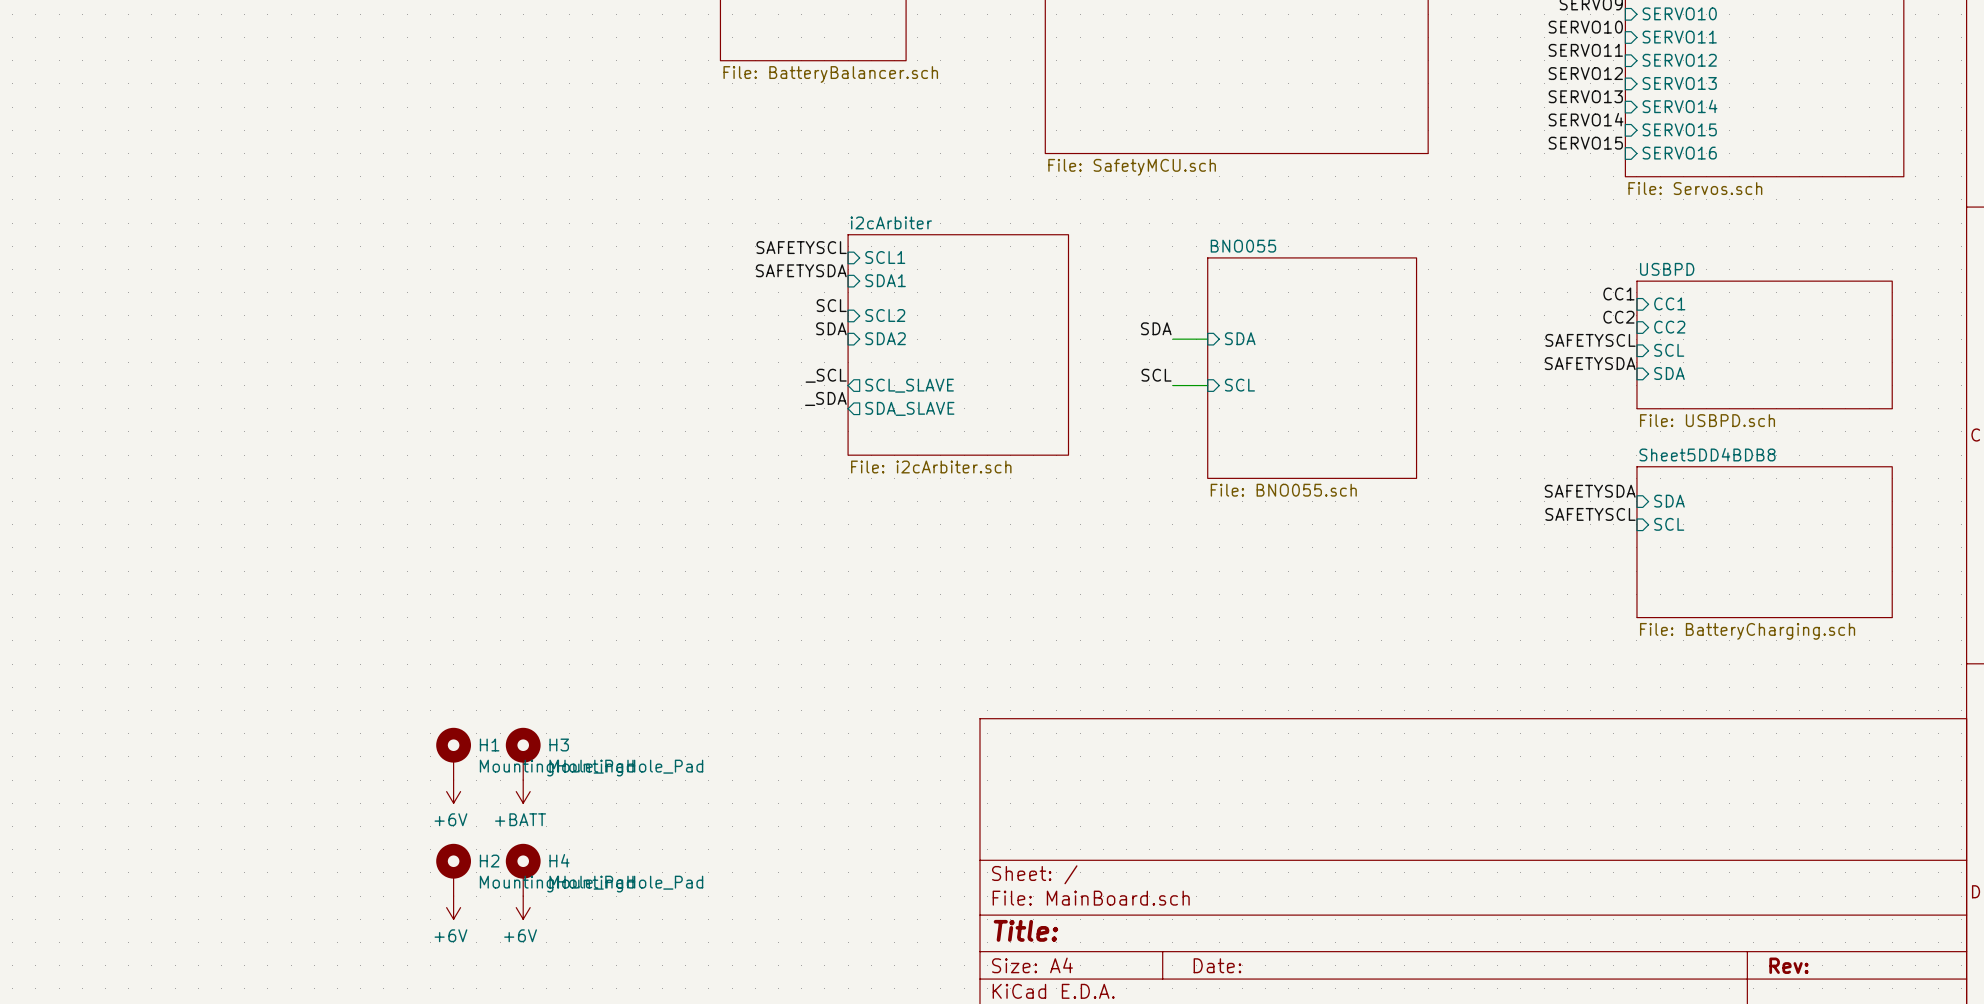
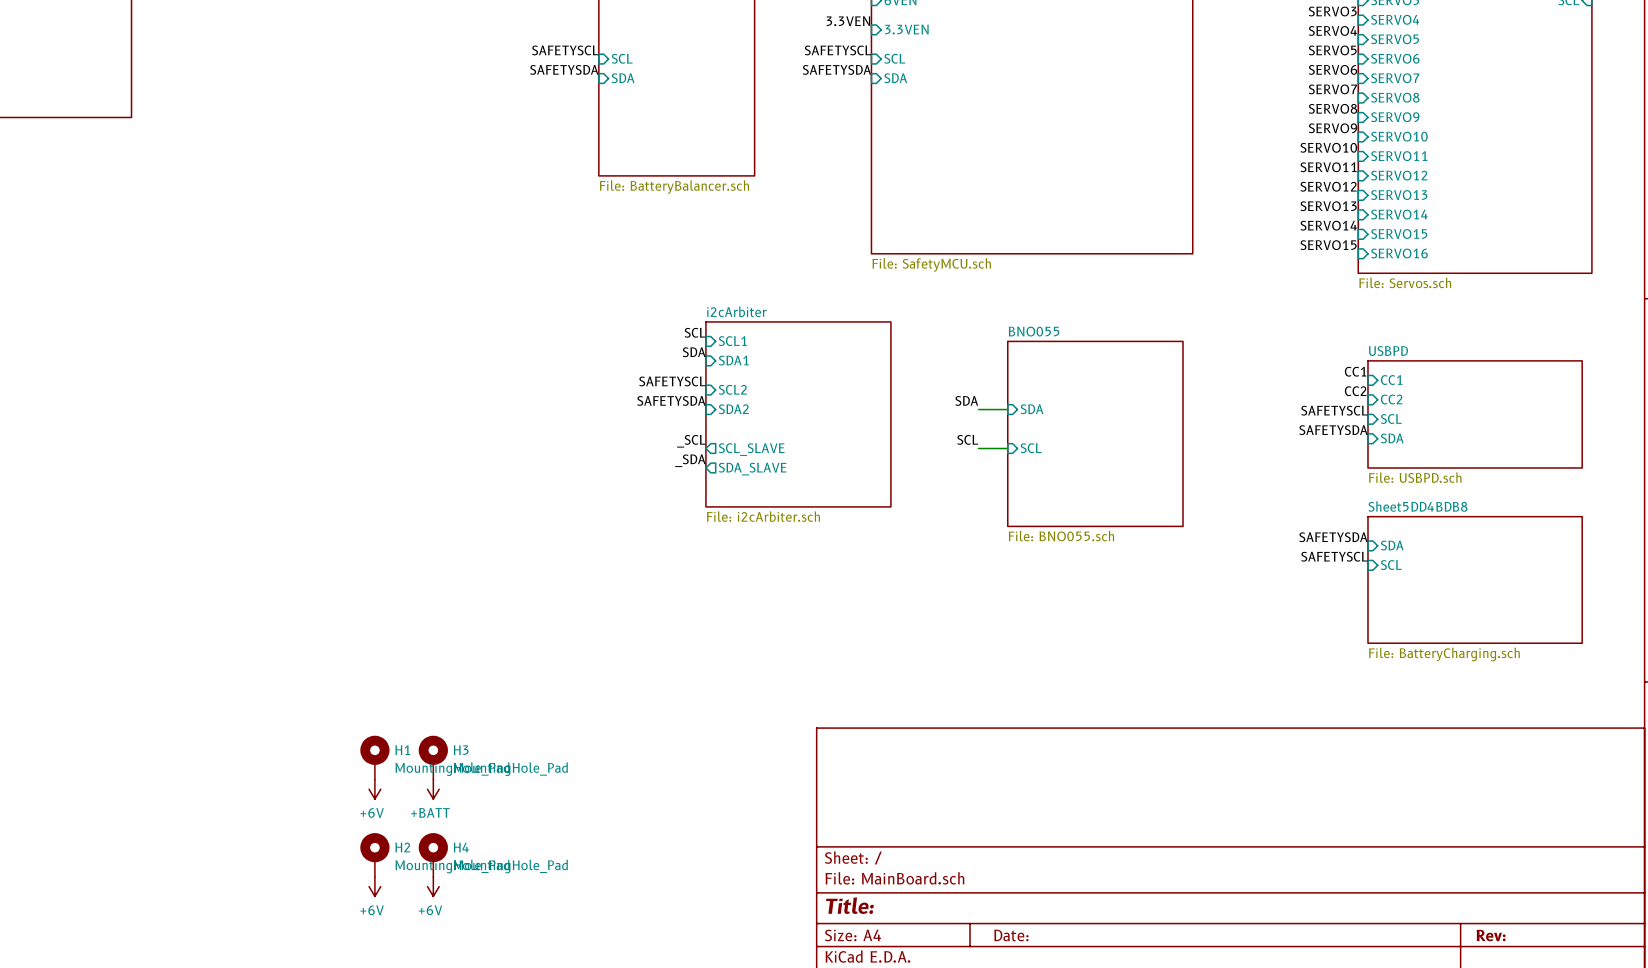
label: SAFETYSCL (801, 247) -> SCL (695, 332)
label: SAFETYSDA (801, 270) -> SDA (694, 352)
label: SCL (831, 305) -> SAFETYSCL (672, 381)
label: SDA (831, 328) -> SAFETYSDA (671, 400)

